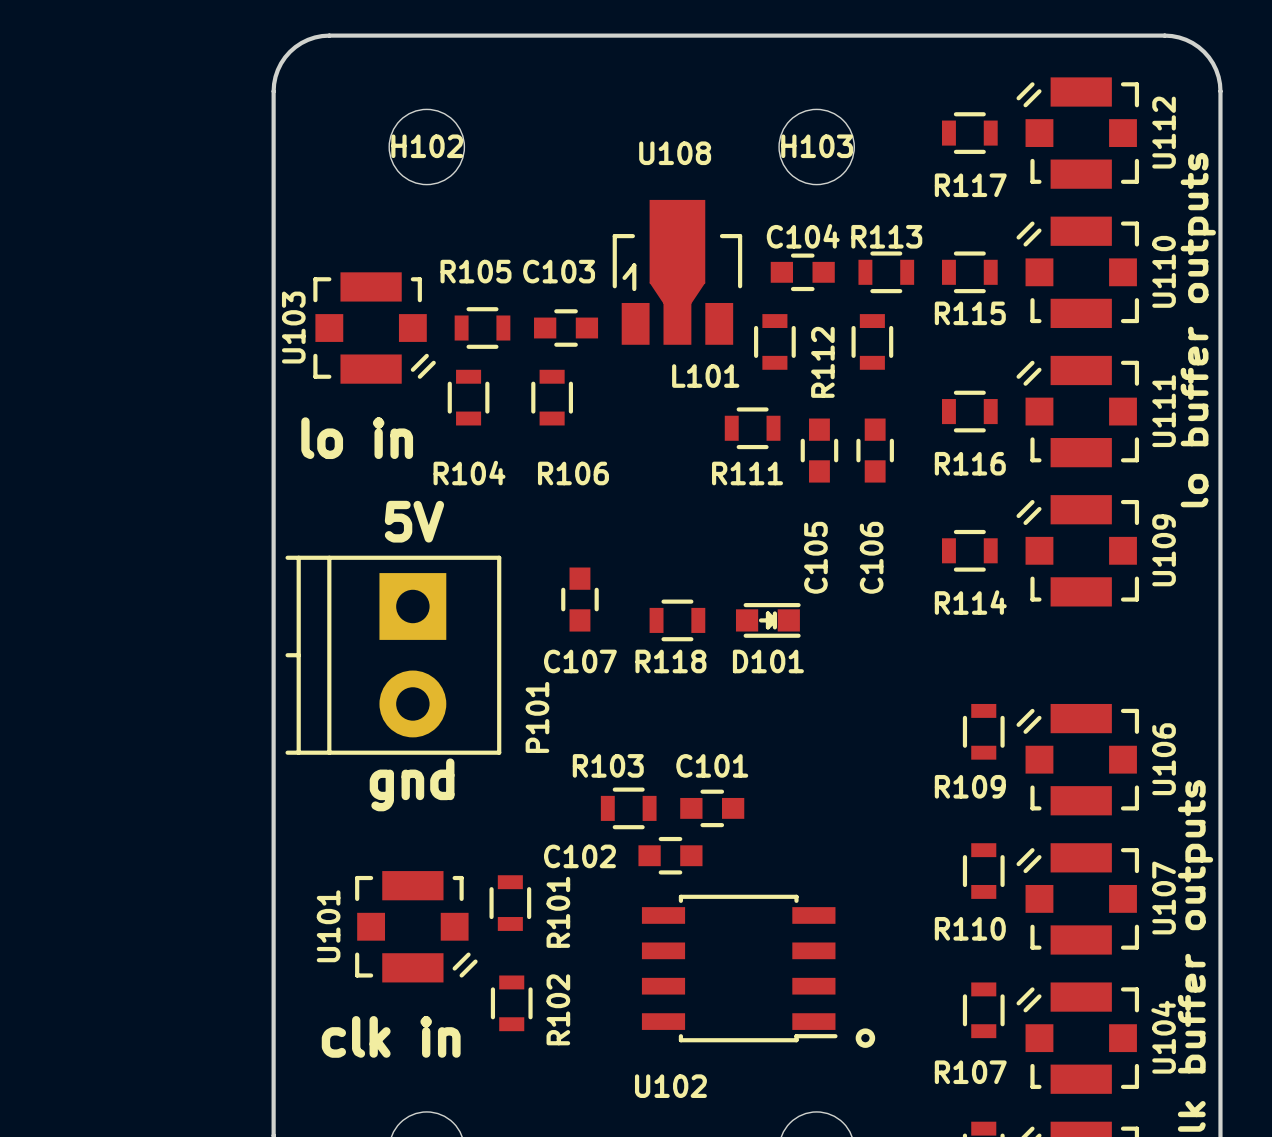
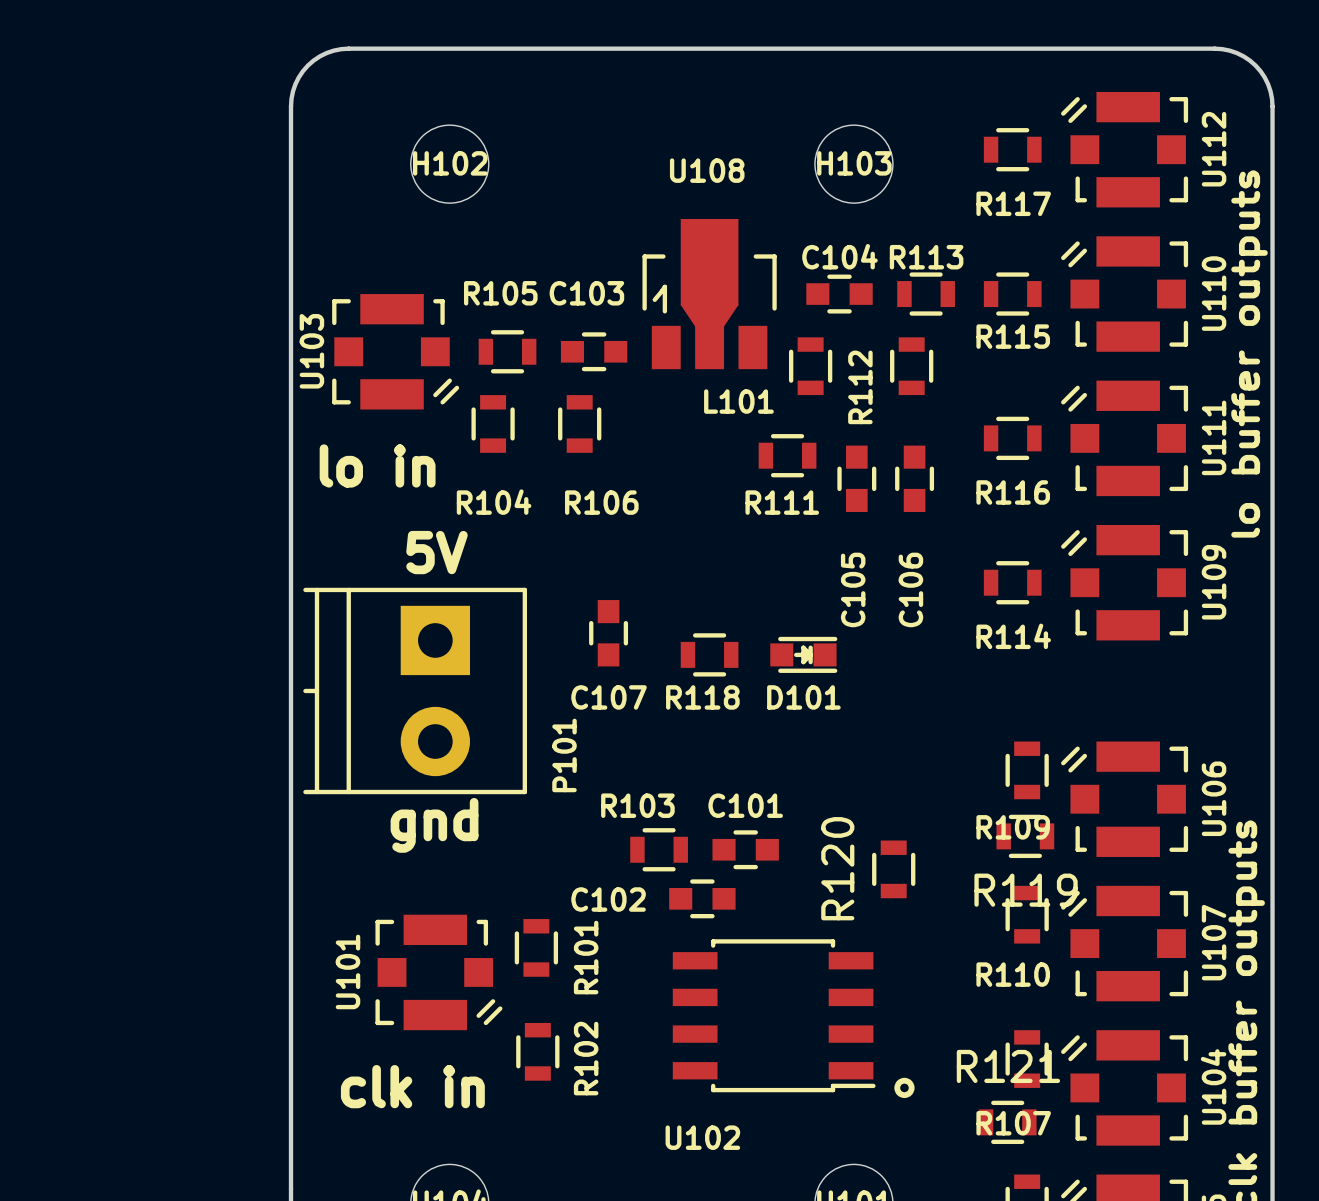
R119: none -> (1025, 836)
R120: none -> (893, 869)
R121: none -> (1007, 1122)

